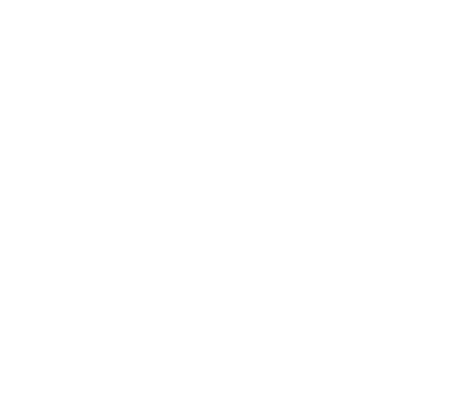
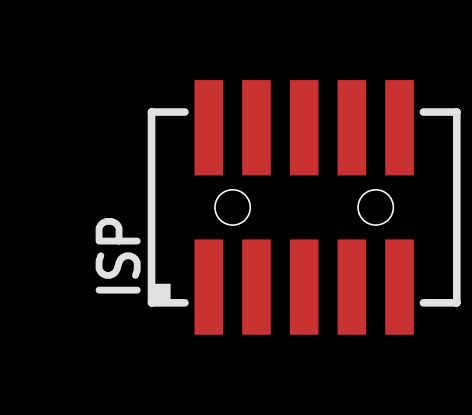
ISP: none -> (304, 207)

